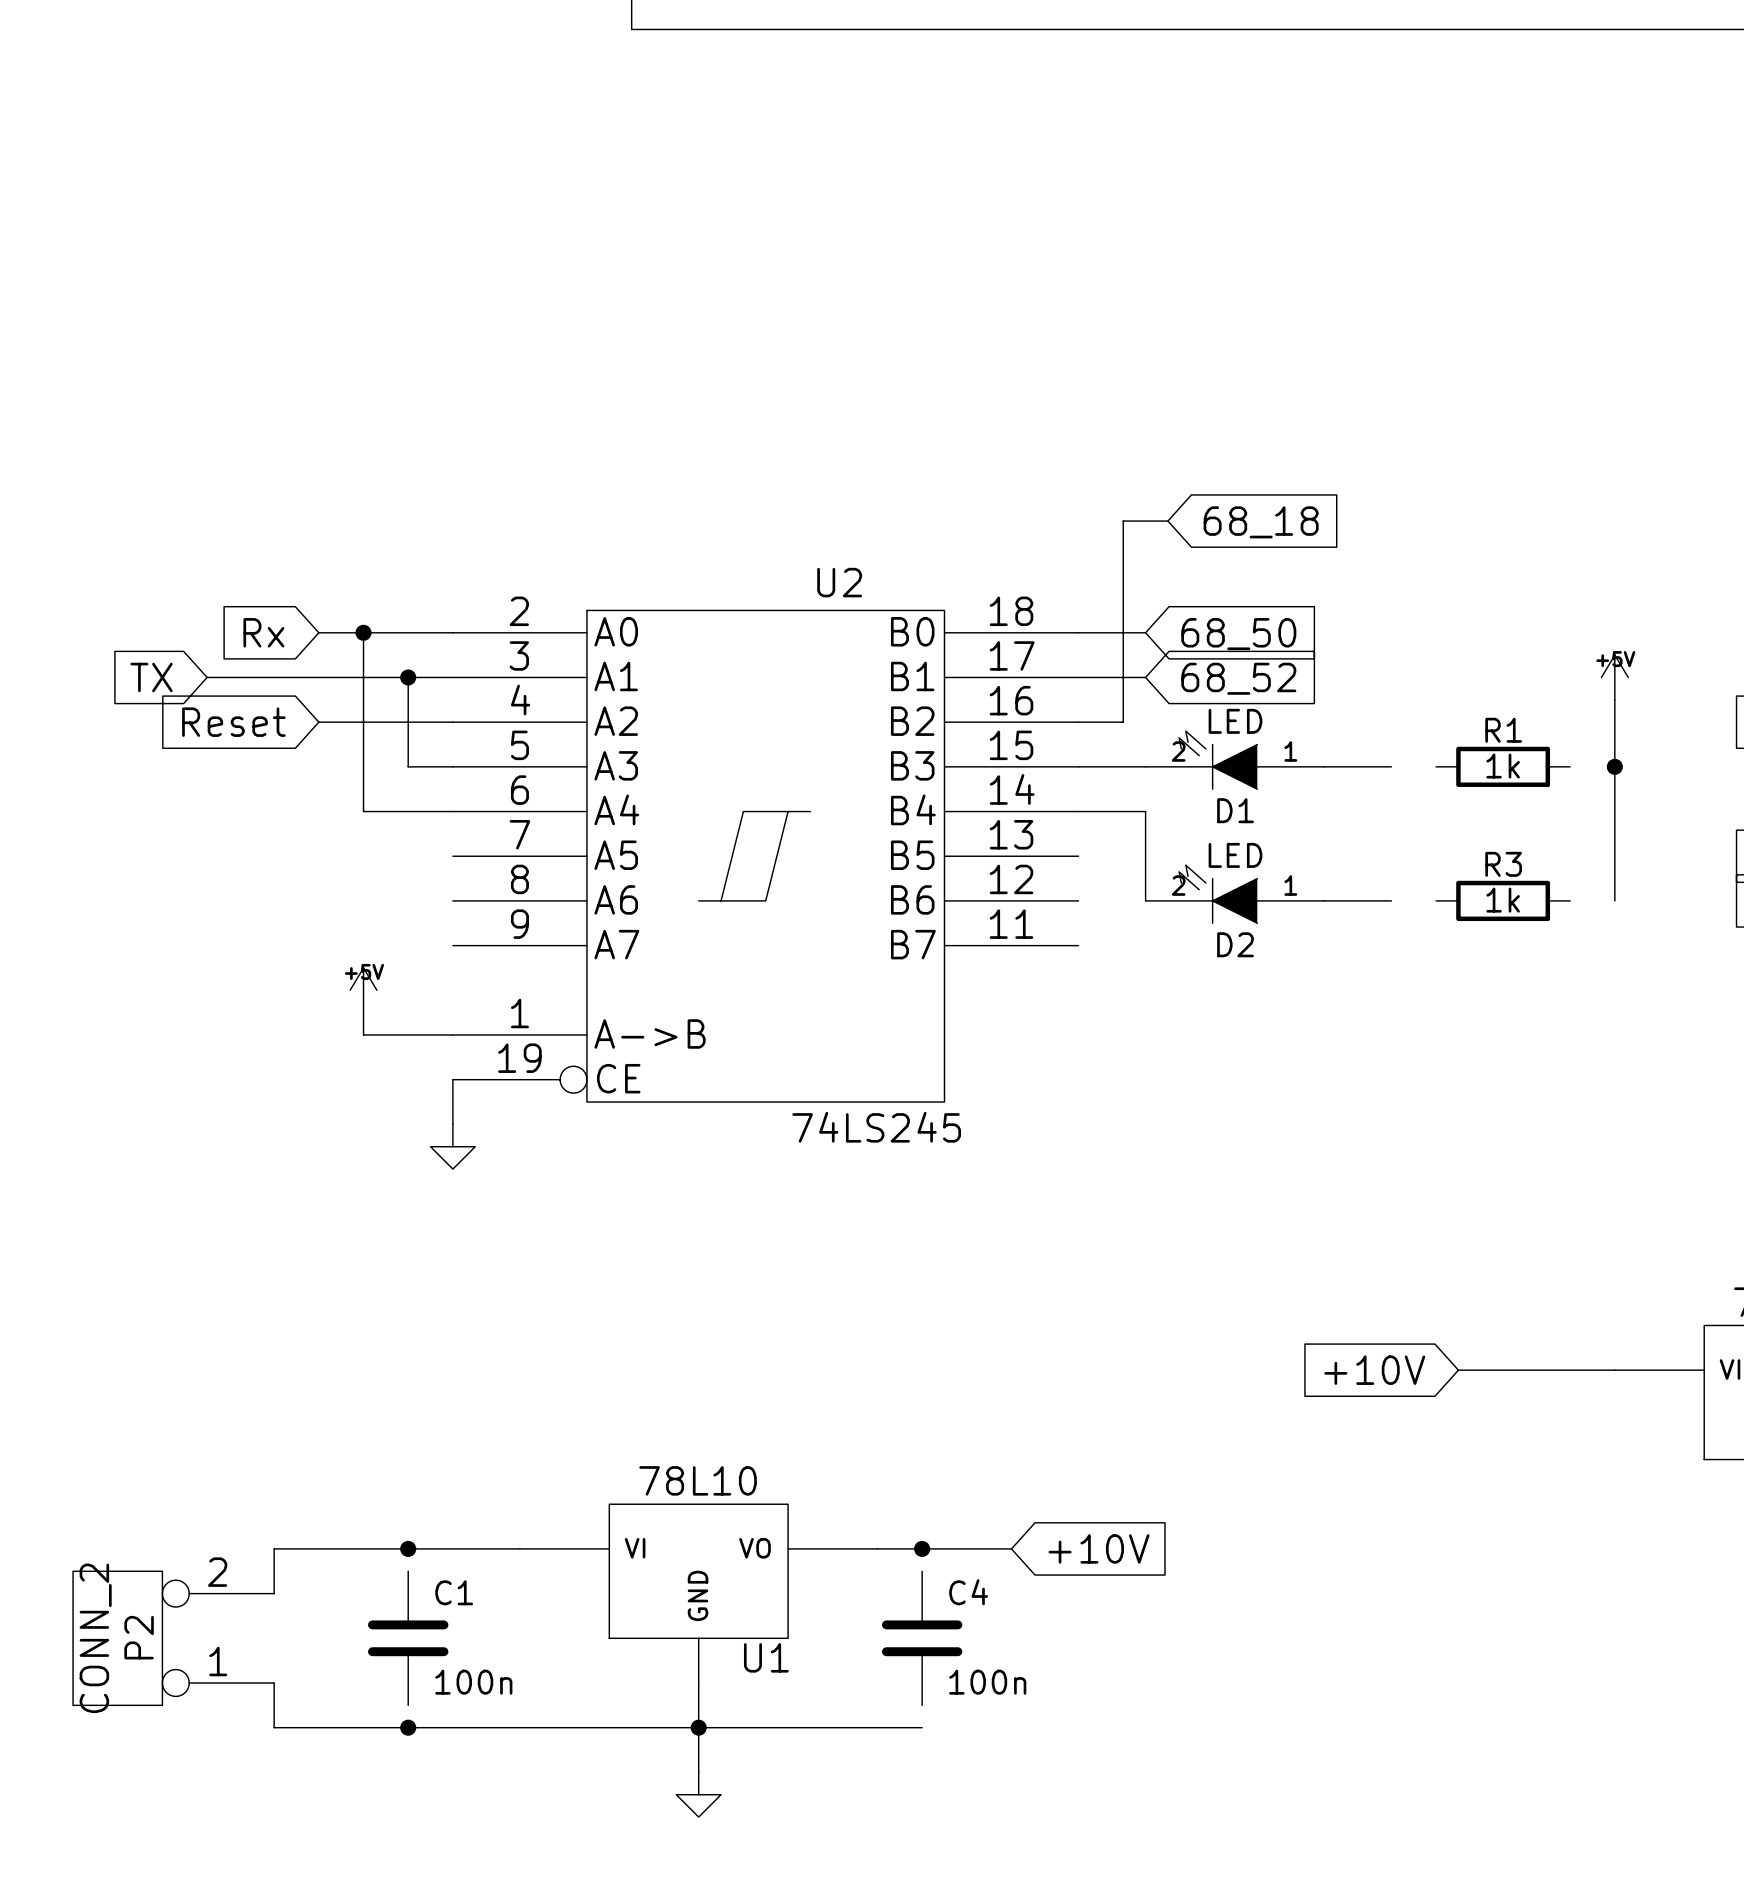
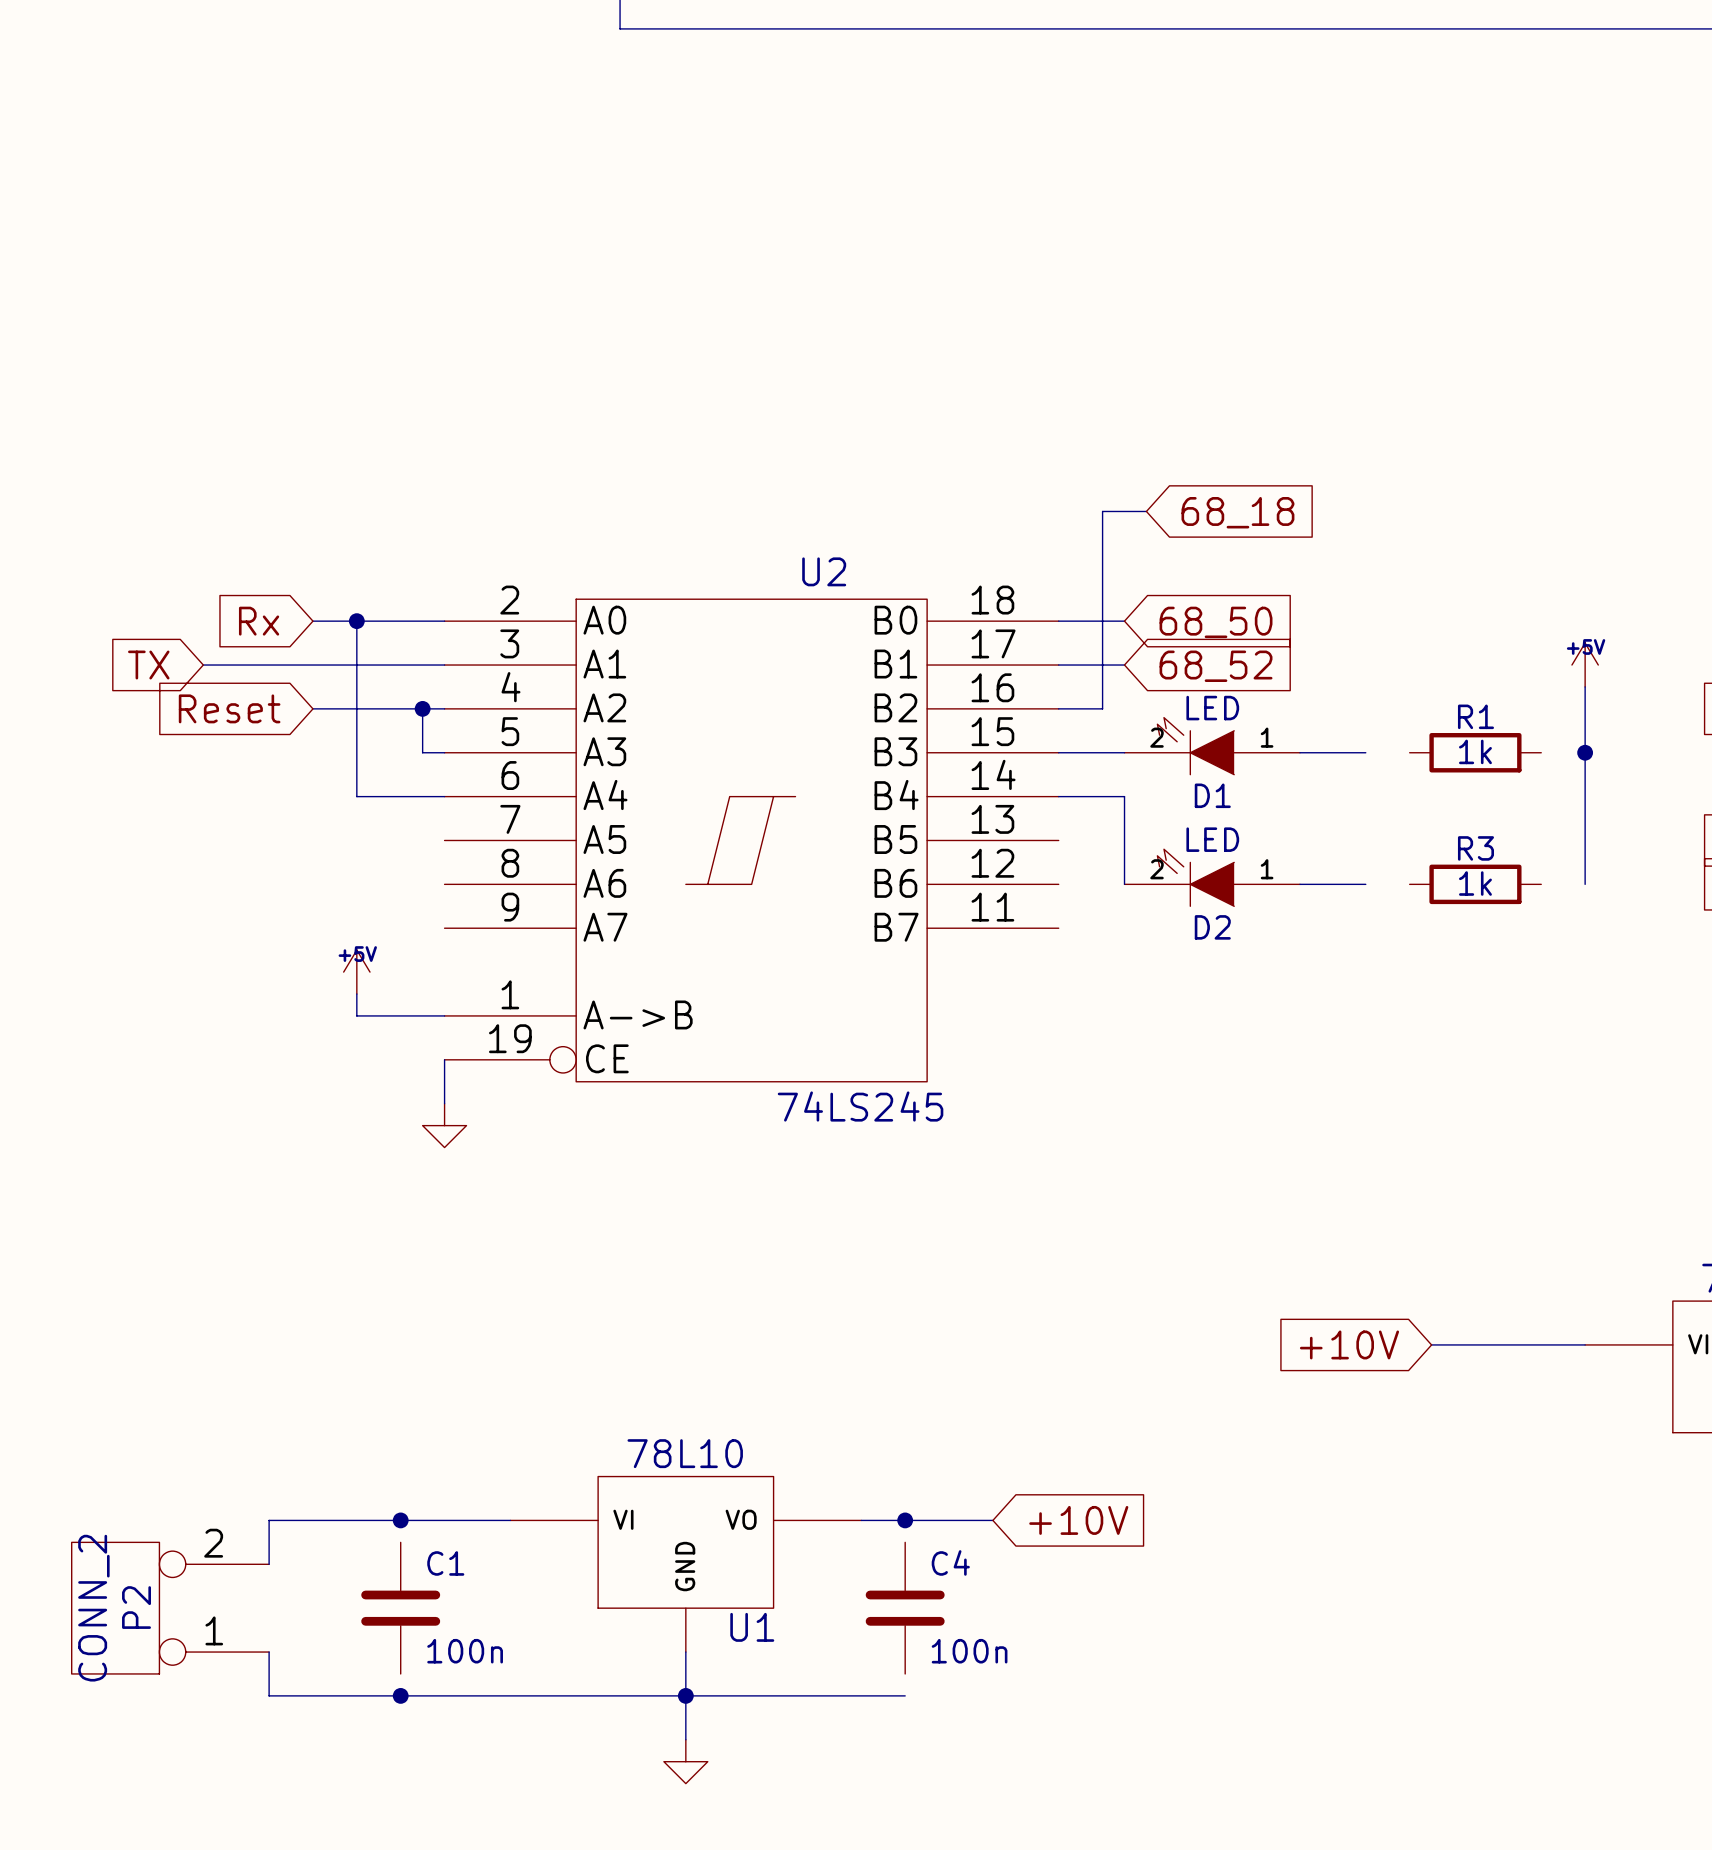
wire: (408, 677) (408, 766) (430, 766) -> (422, 708) (422, 752)
junction position: (408, 677) -> (422, 708)

